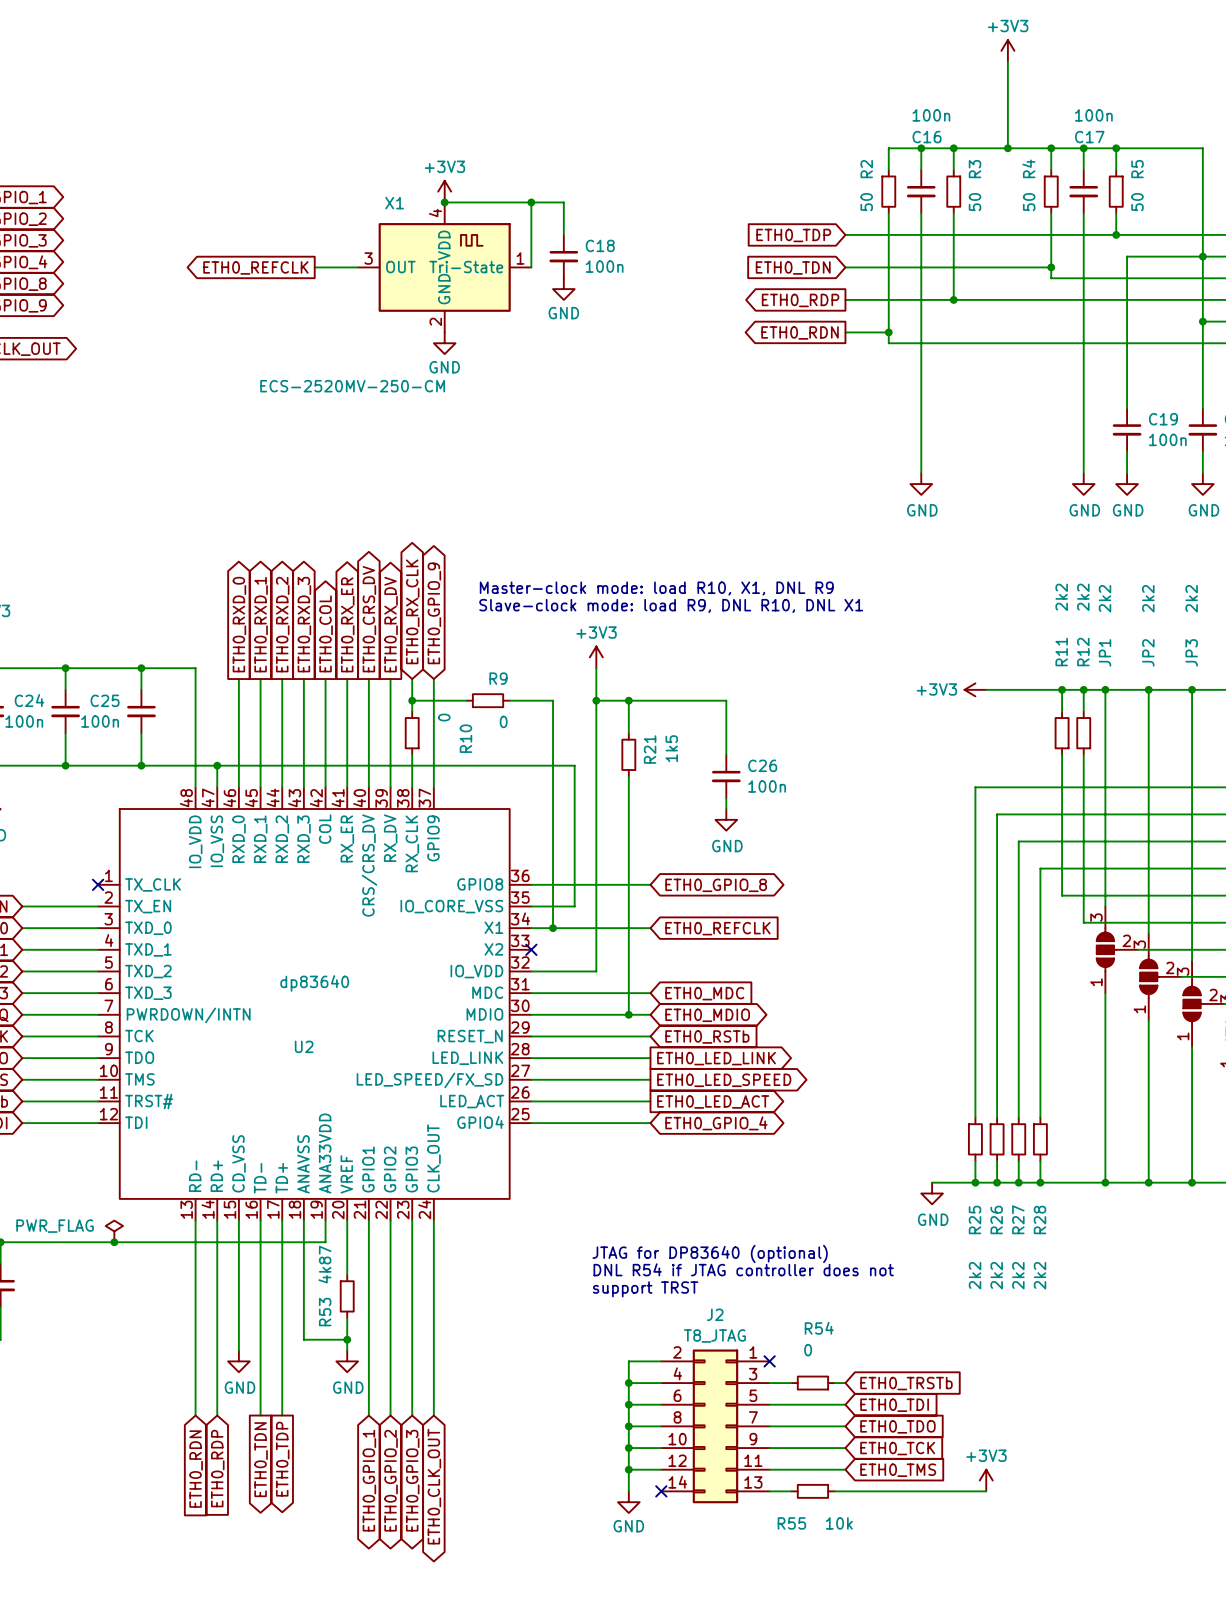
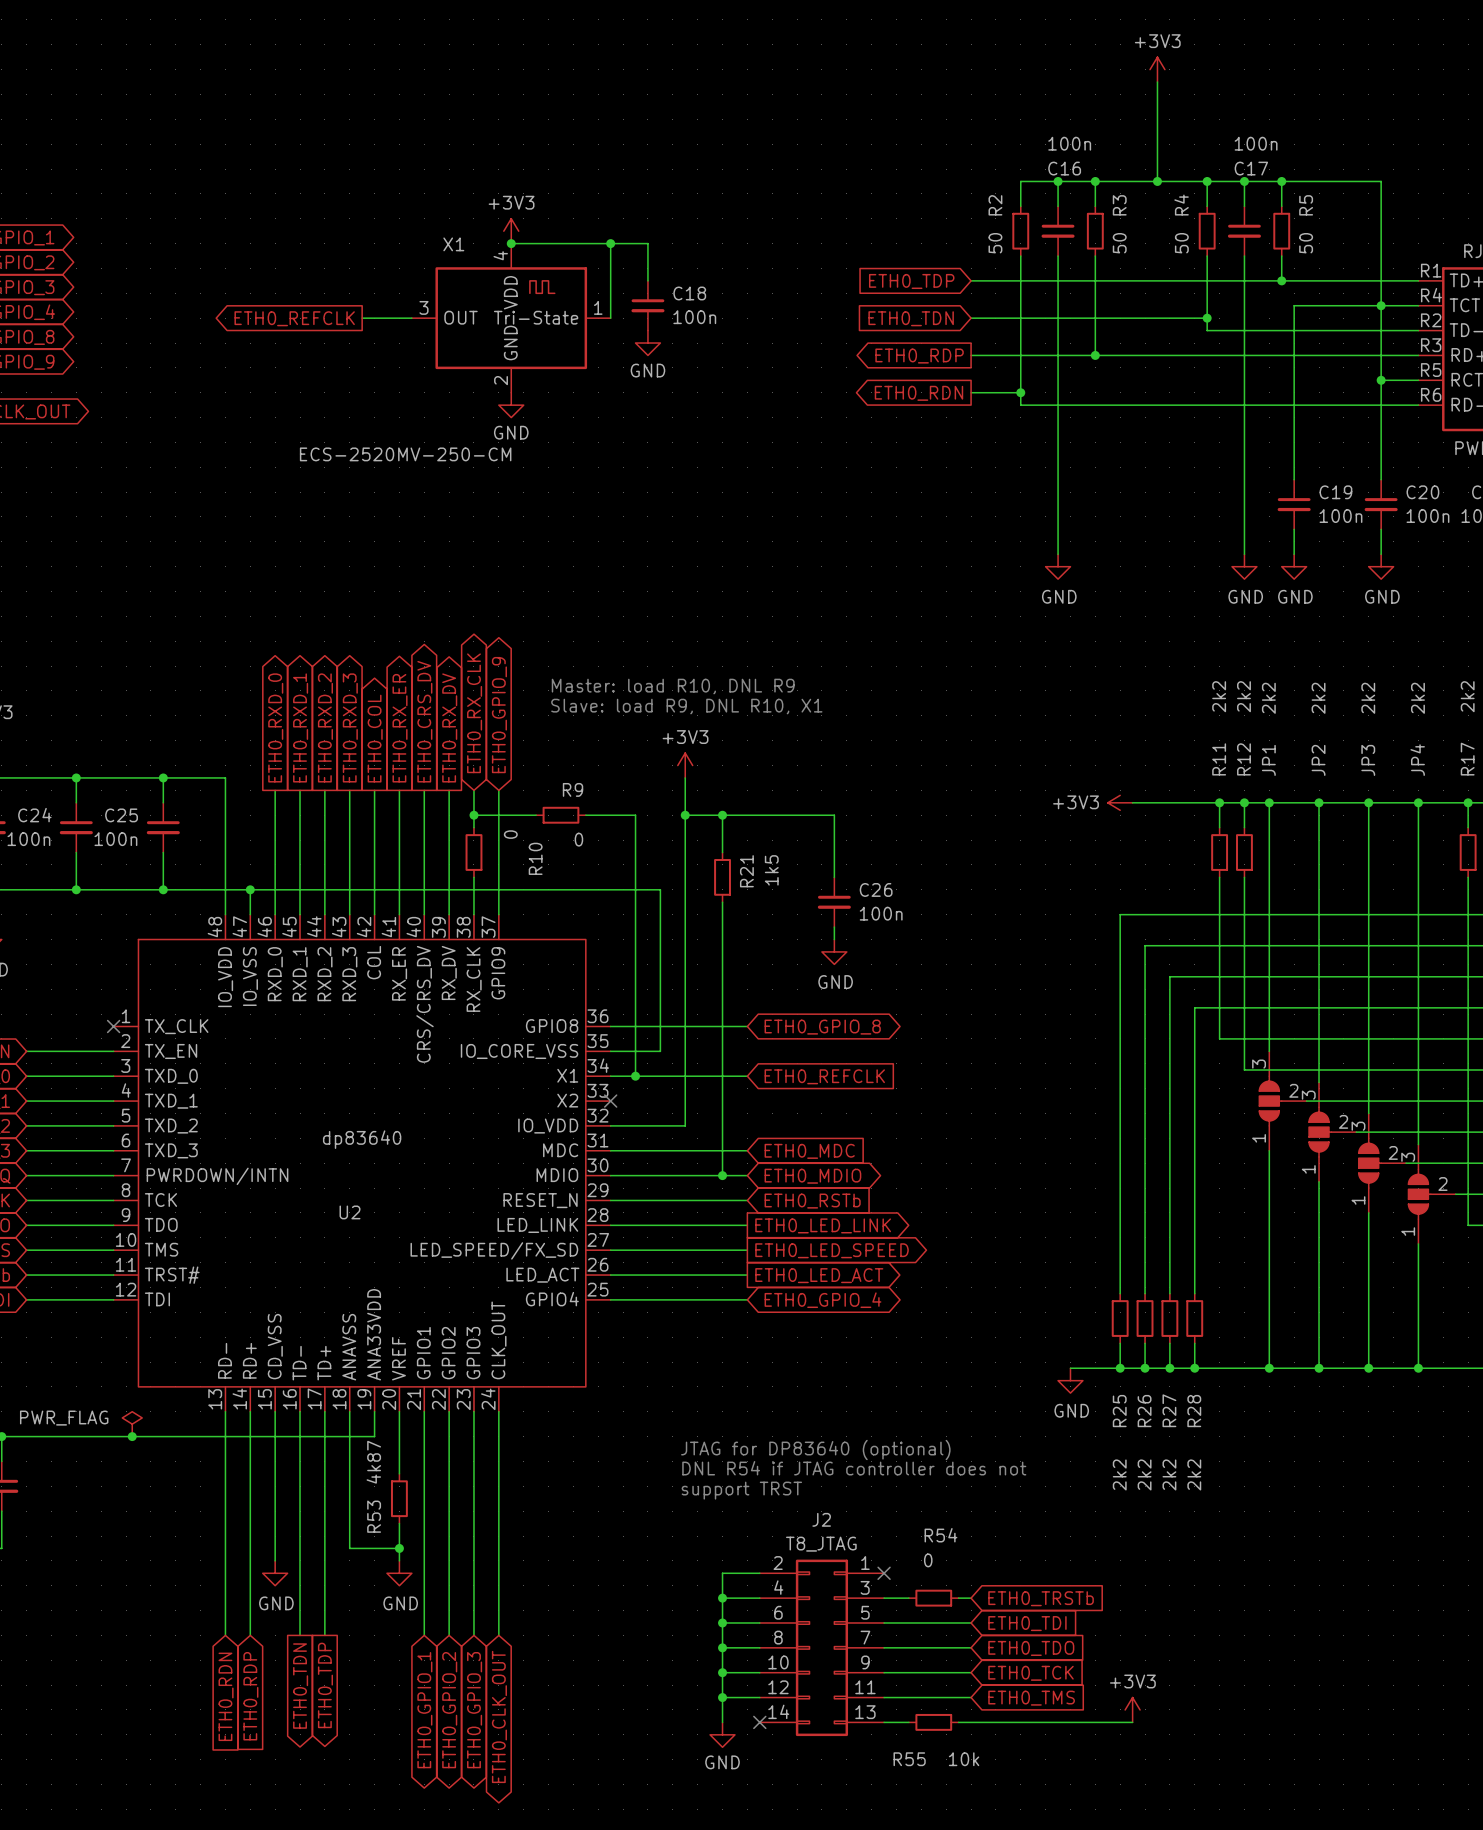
text: Master-clock mode: load R10, X1, DNL R9 (656, 588) -> Master: load R10, DNL R9 (673, 686)
text: Slave-clock mode: load R9, DNL R10, DNL X1 (671, 605) -> Slave: load R9, DNL R10, X1 (686, 706)

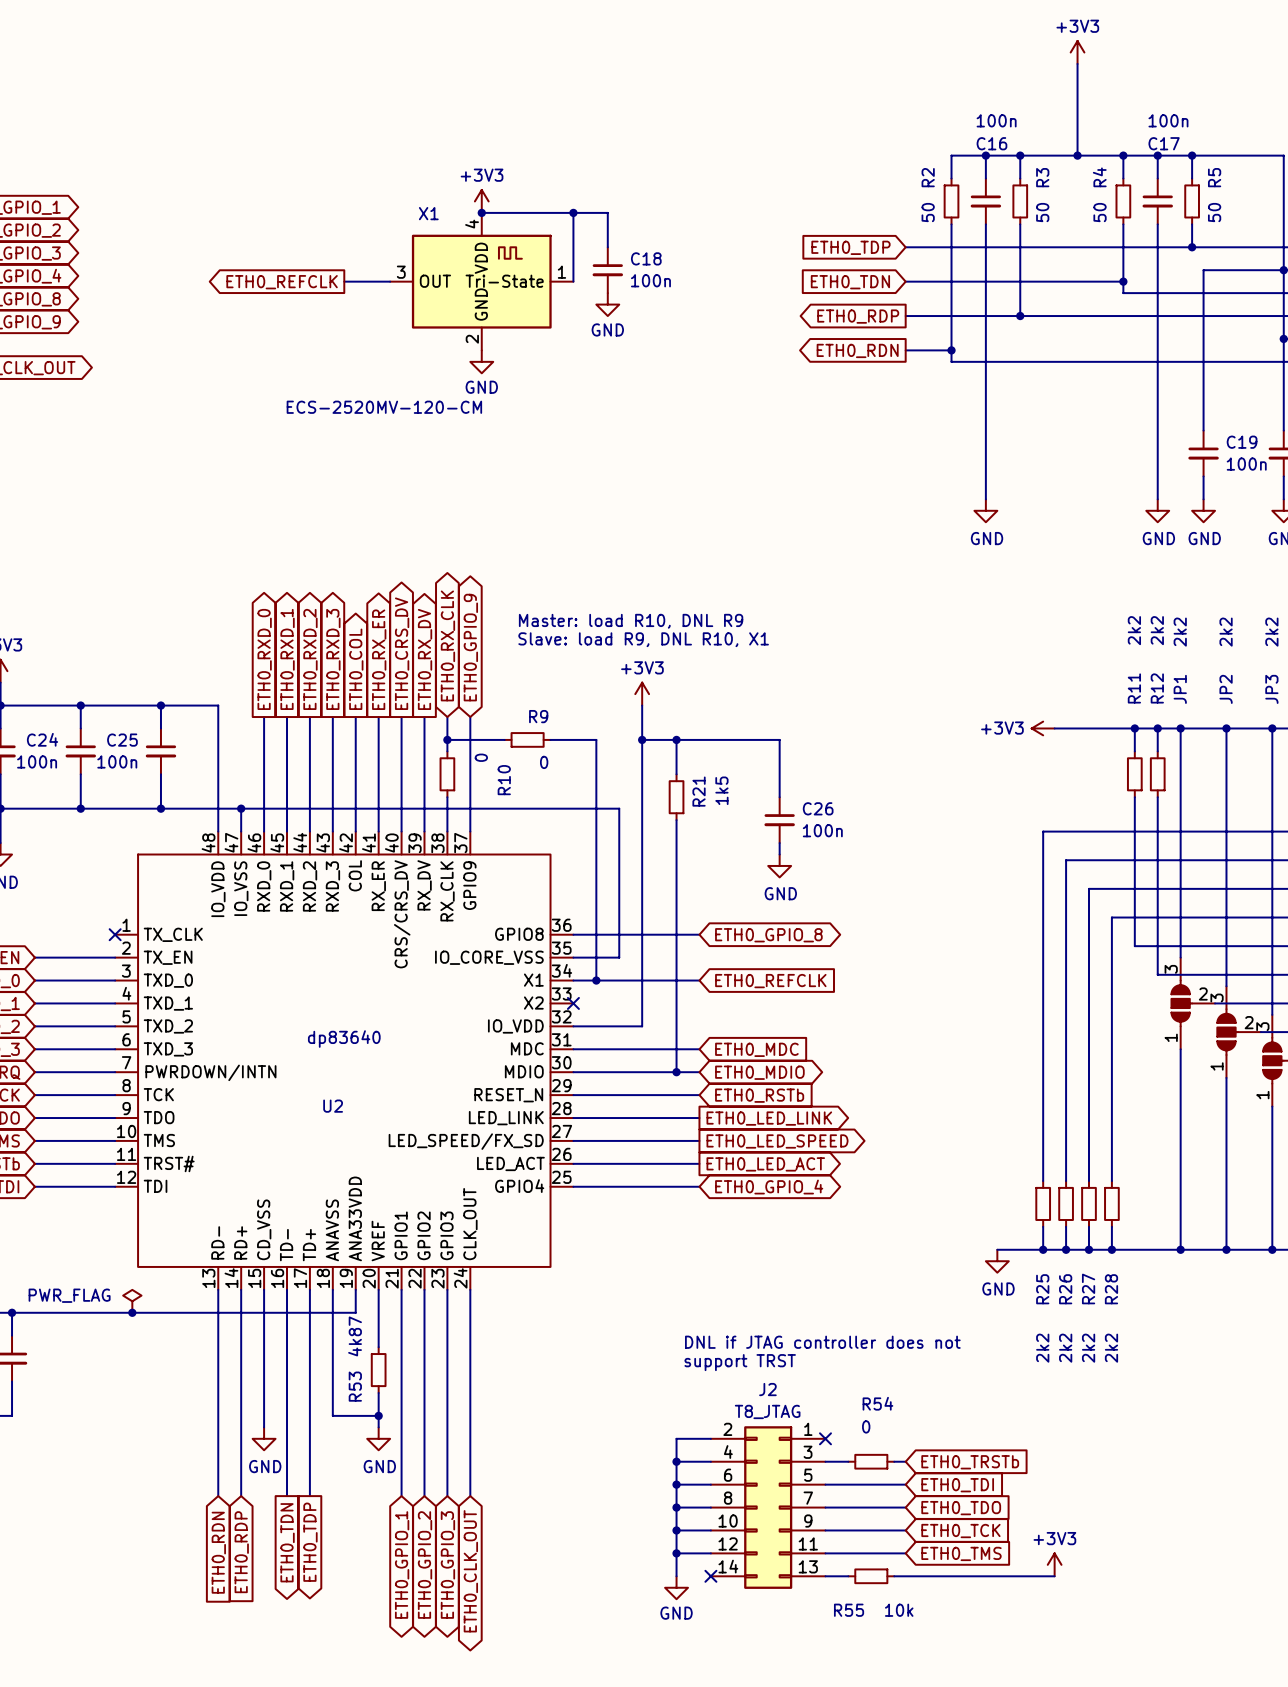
X1 value: ECS-2520MV-250-CM (405, 454) -> ECS-2520MV-120-CM (384, 407)
text: JTAG for DP83640 (optional) (815, 1450) -> none
text: DNL R54 if JTAG controller does not (854, 1468) -> DNL if JTAG controller does not (822, 1342)
text position: support TRST (741, 1490) -> support TRST (740, 1362)

